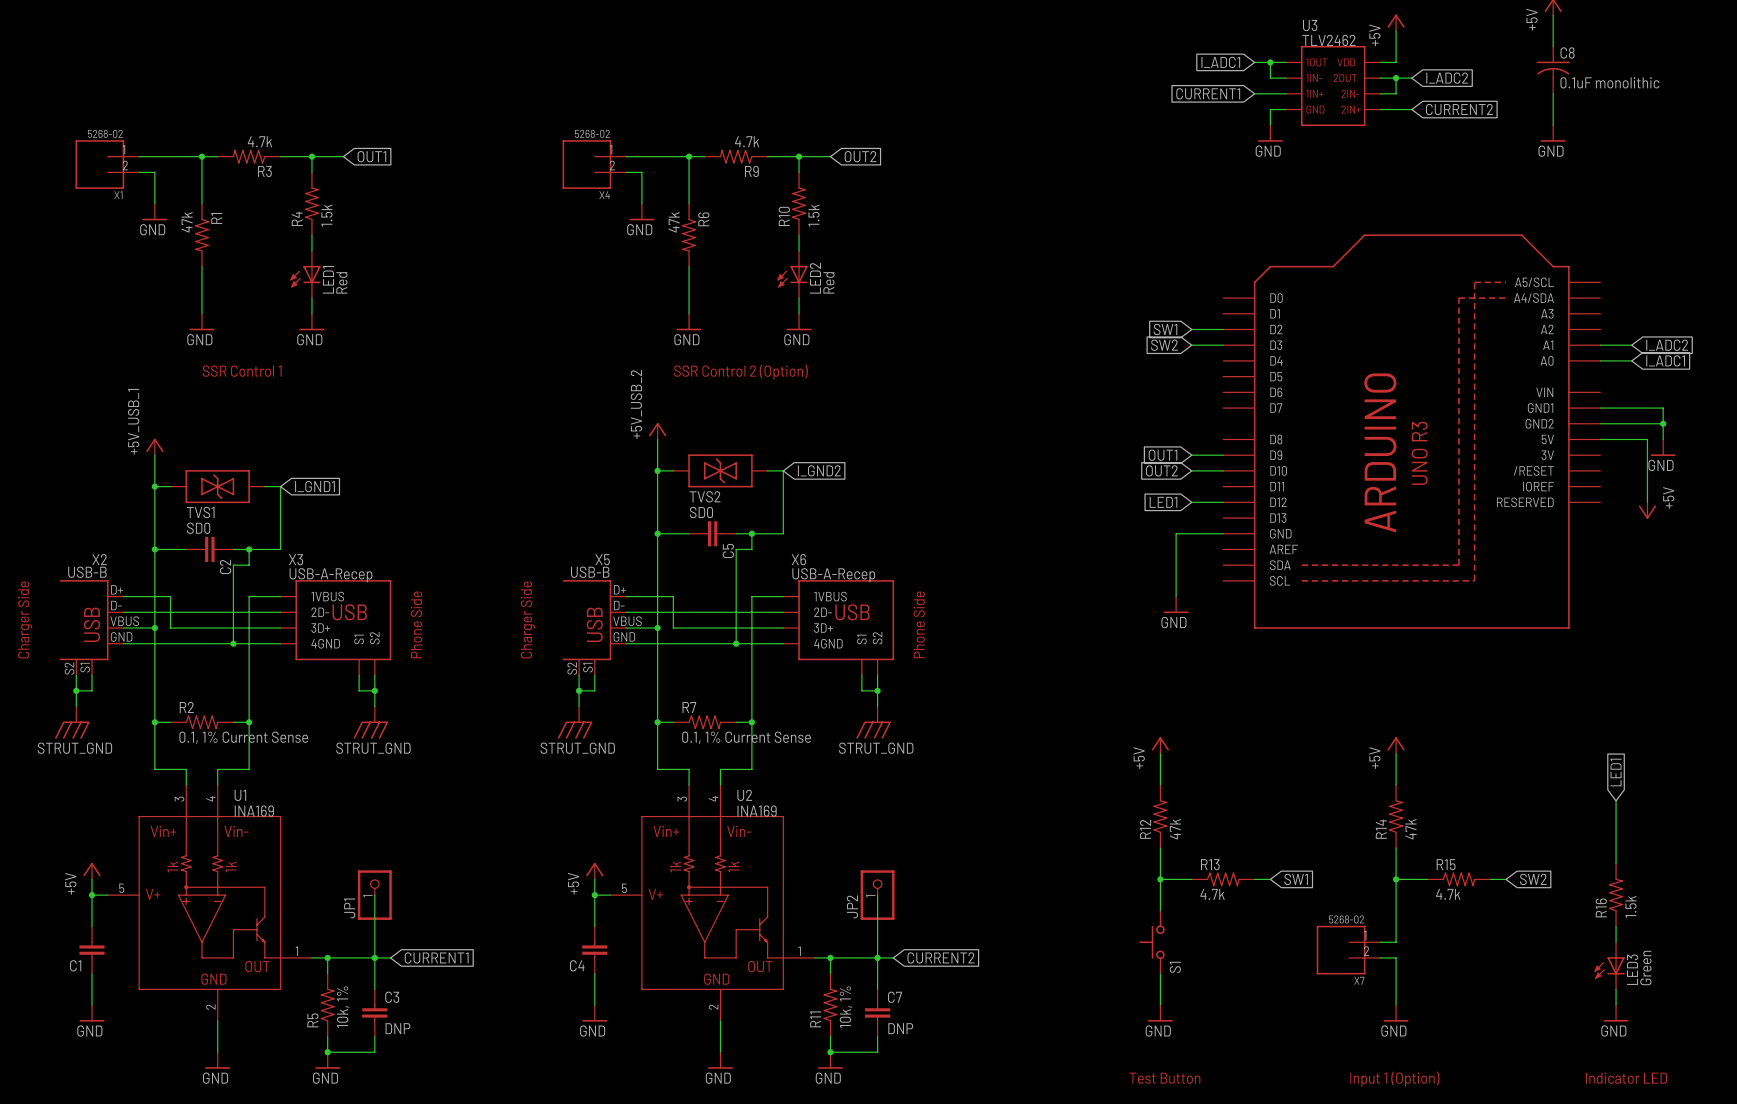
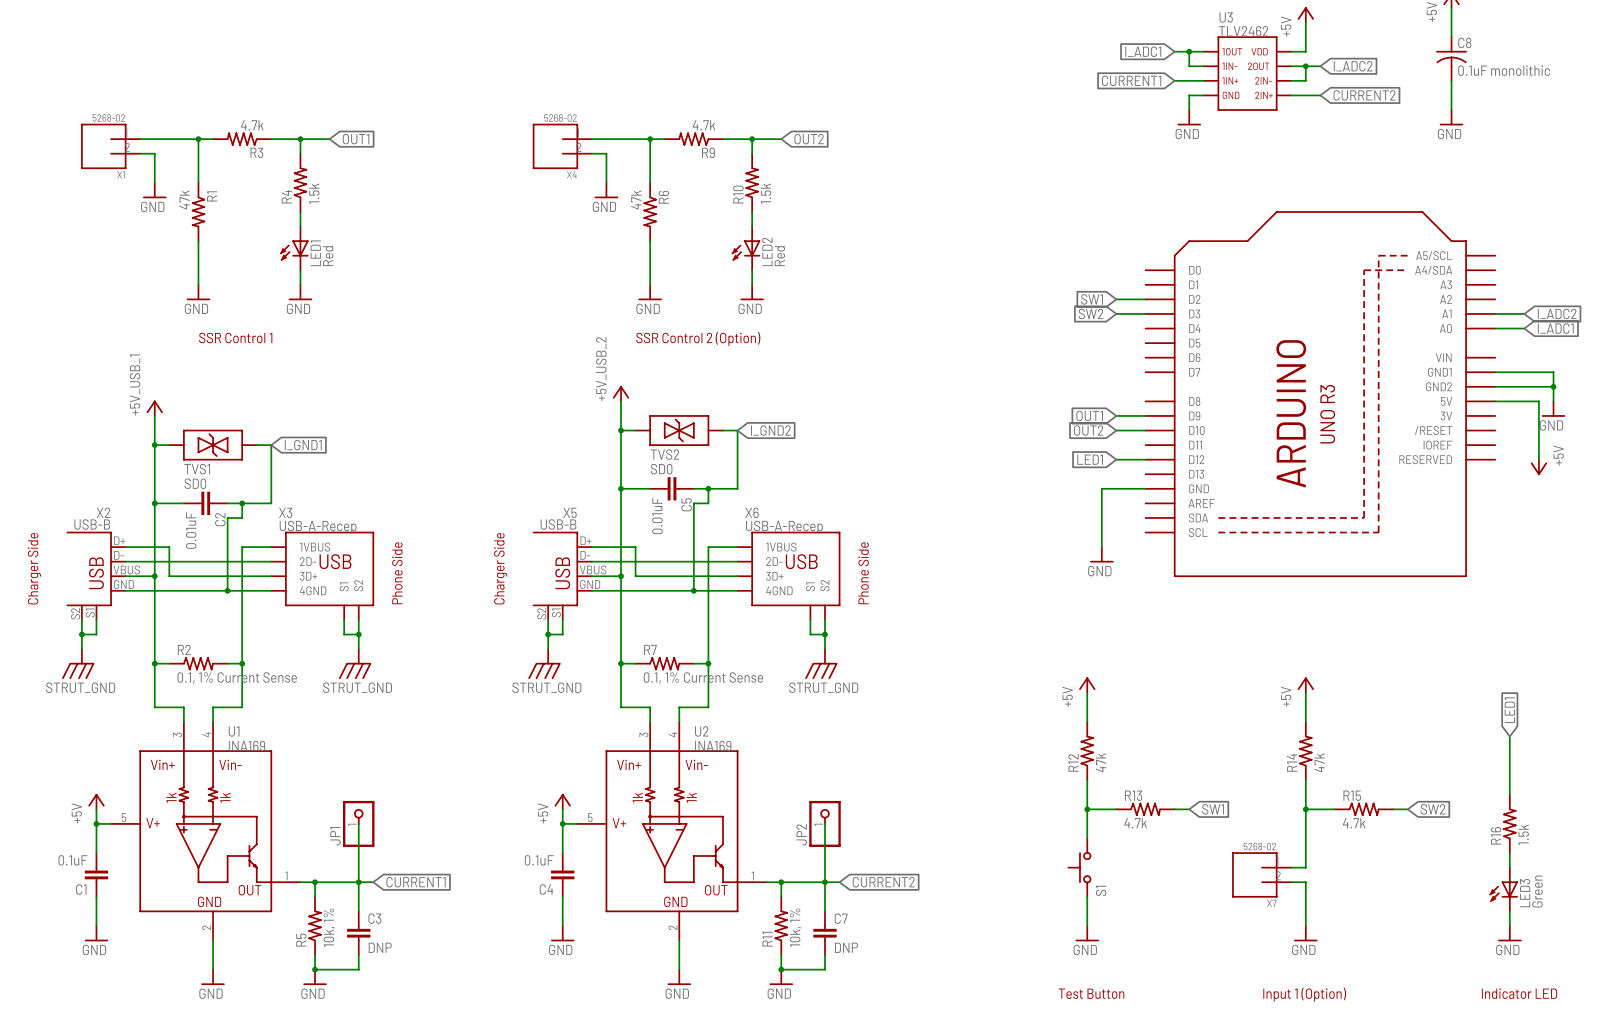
C5 value: none -> 0.01uF (657, 516)
C2 value: none -> 0.01uF (191, 530)
C1 value: none -> 0.1uF (72, 860)
C4 value: none -> 0.1uF (539, 860)

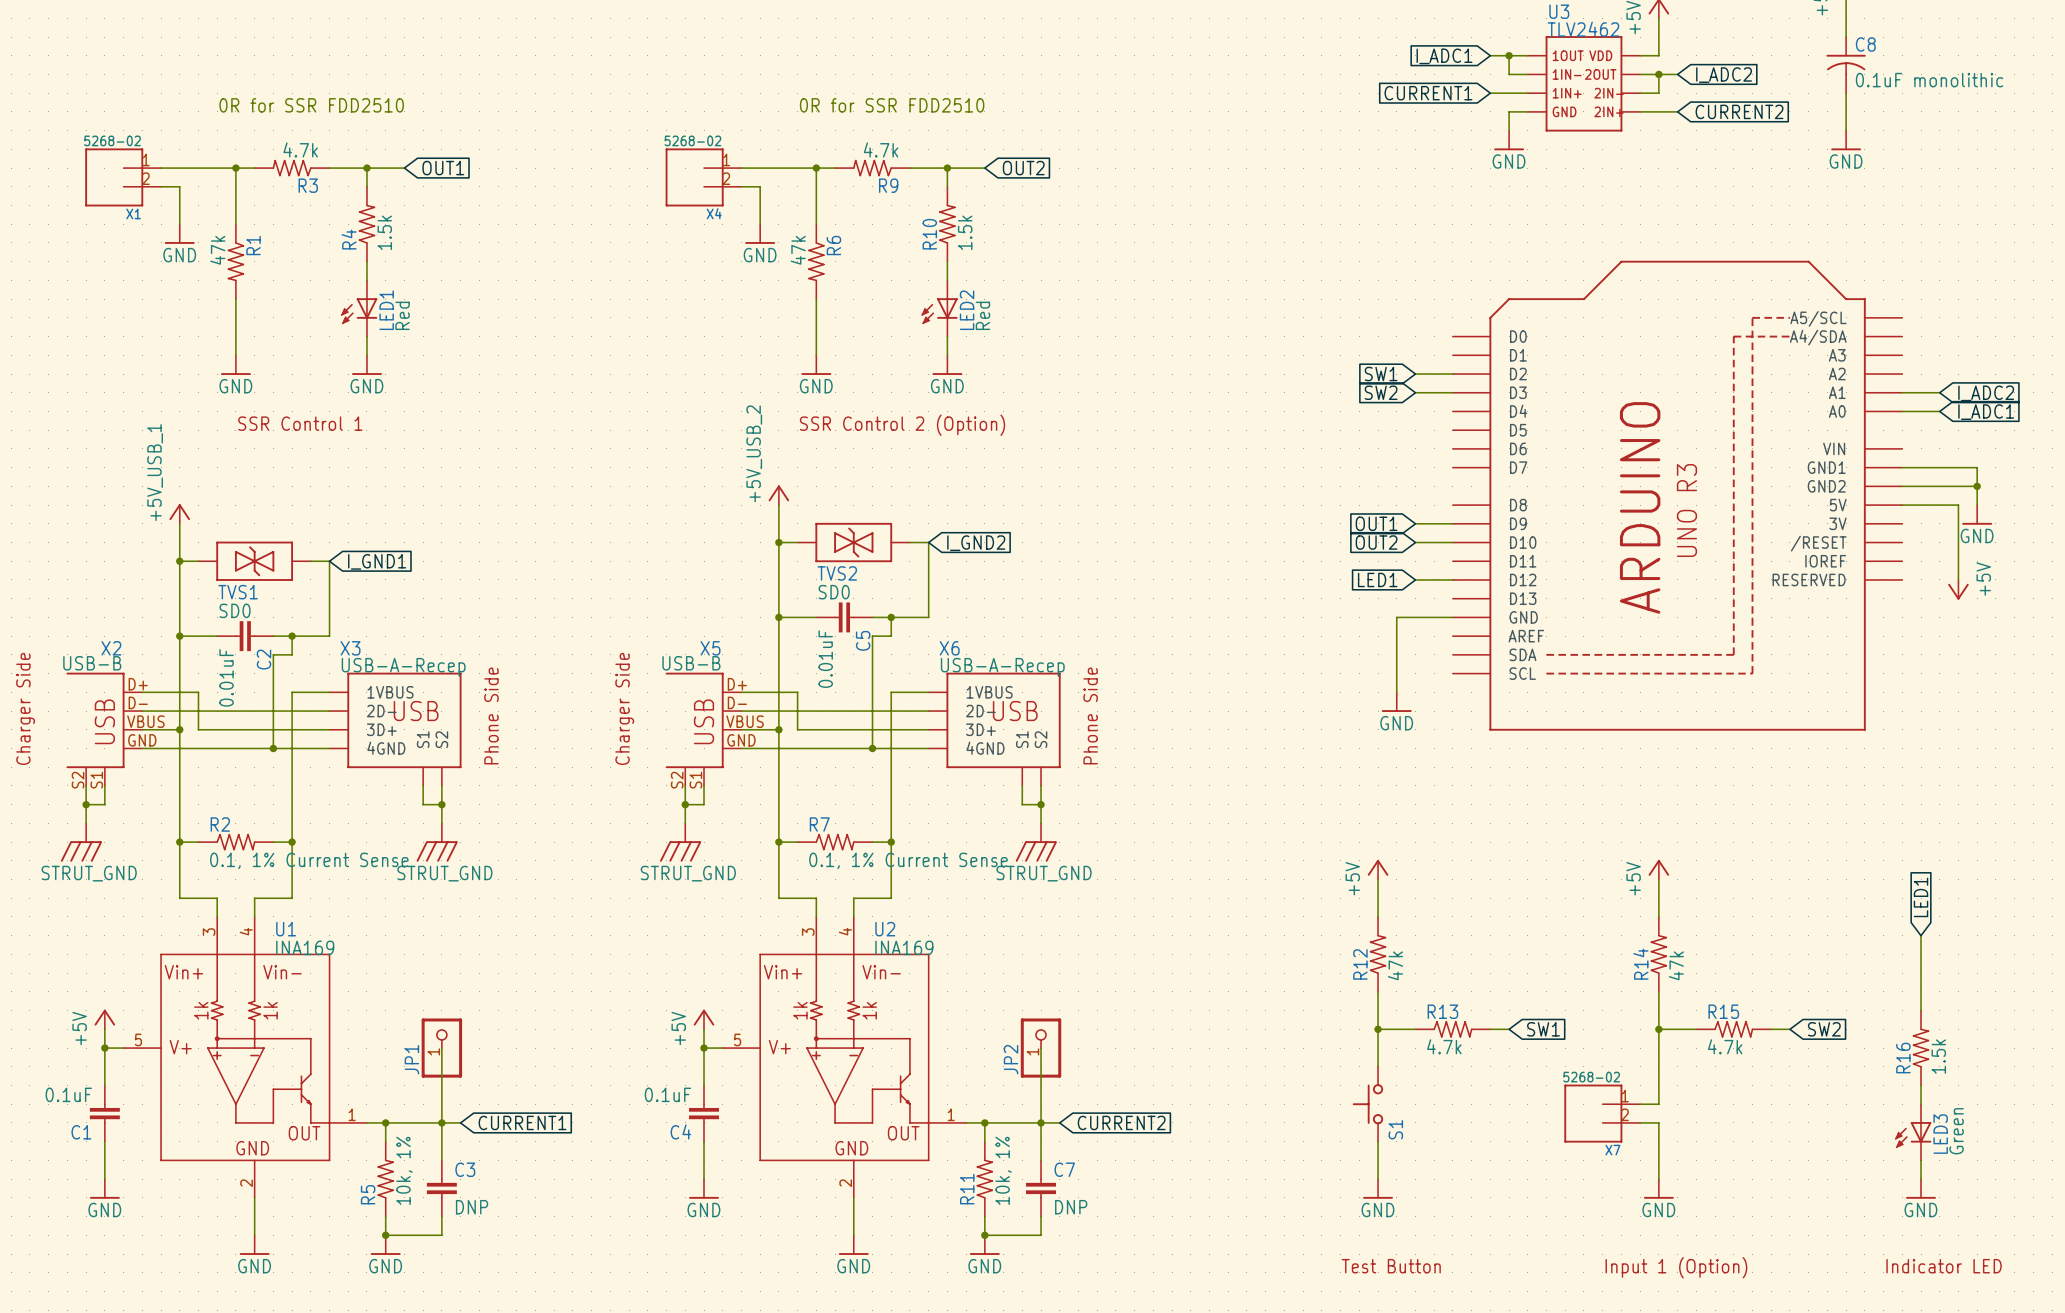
text: none -> 0R for SSR FDD2510 (311, 105)
text: none -> 0R for SSR FDD2510 (892, 105)

